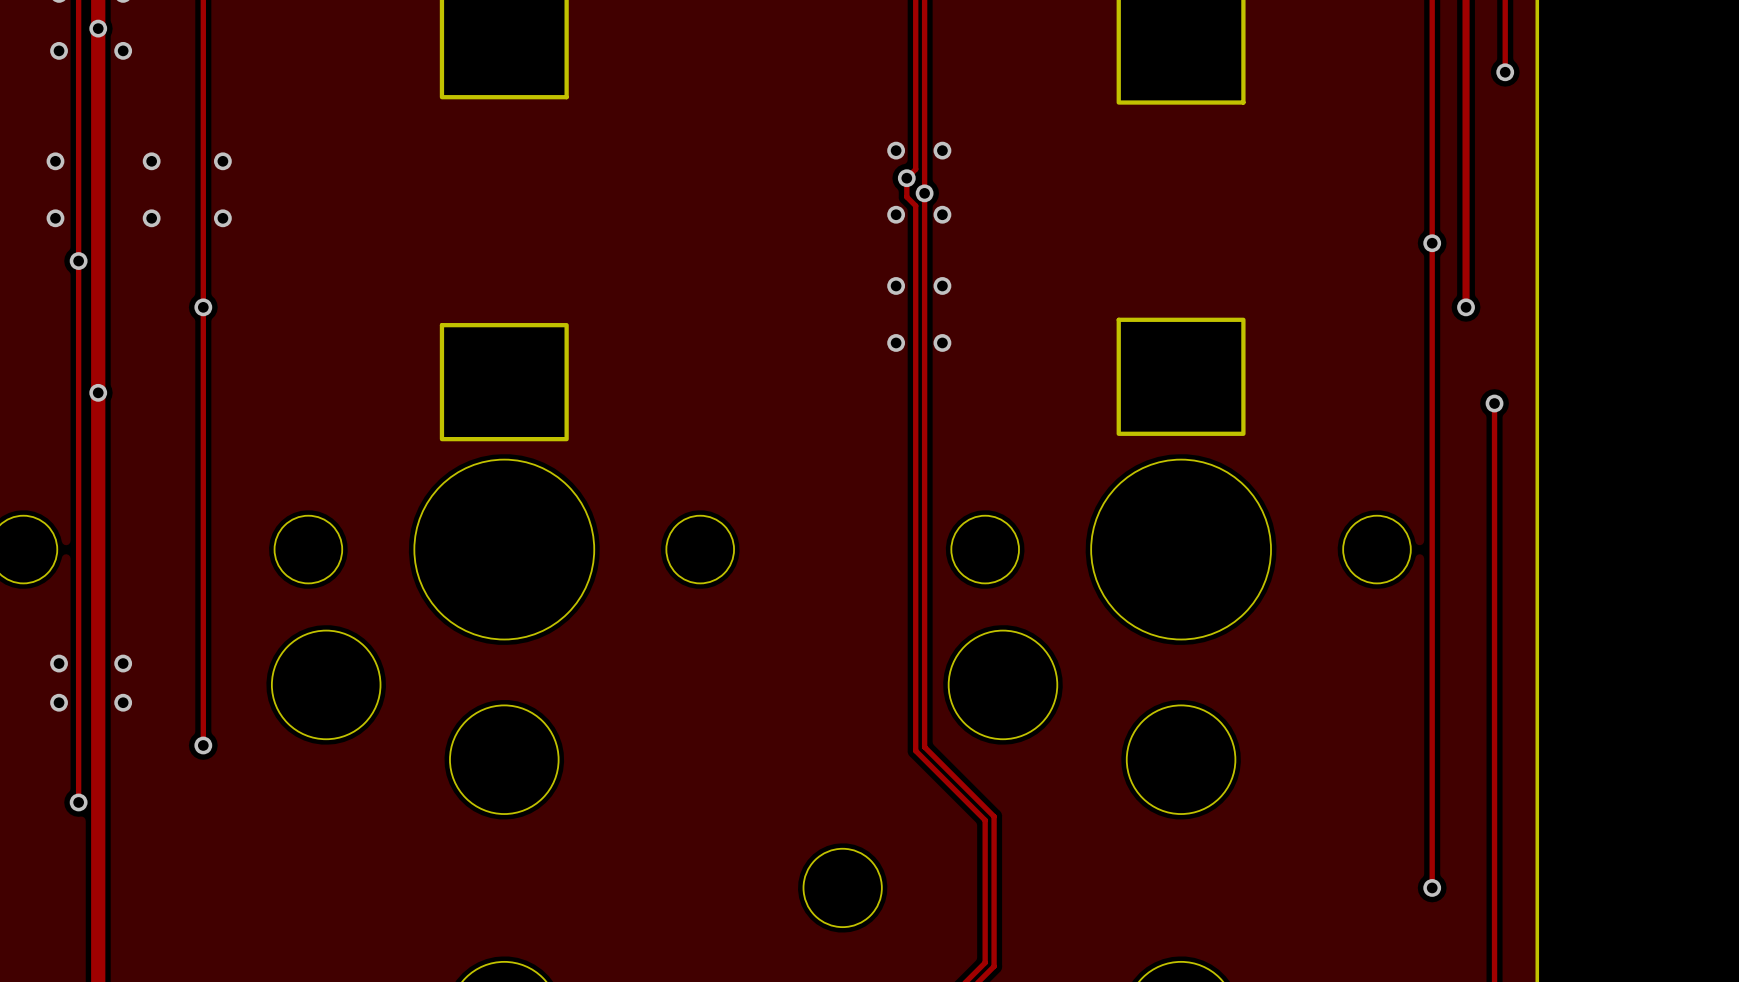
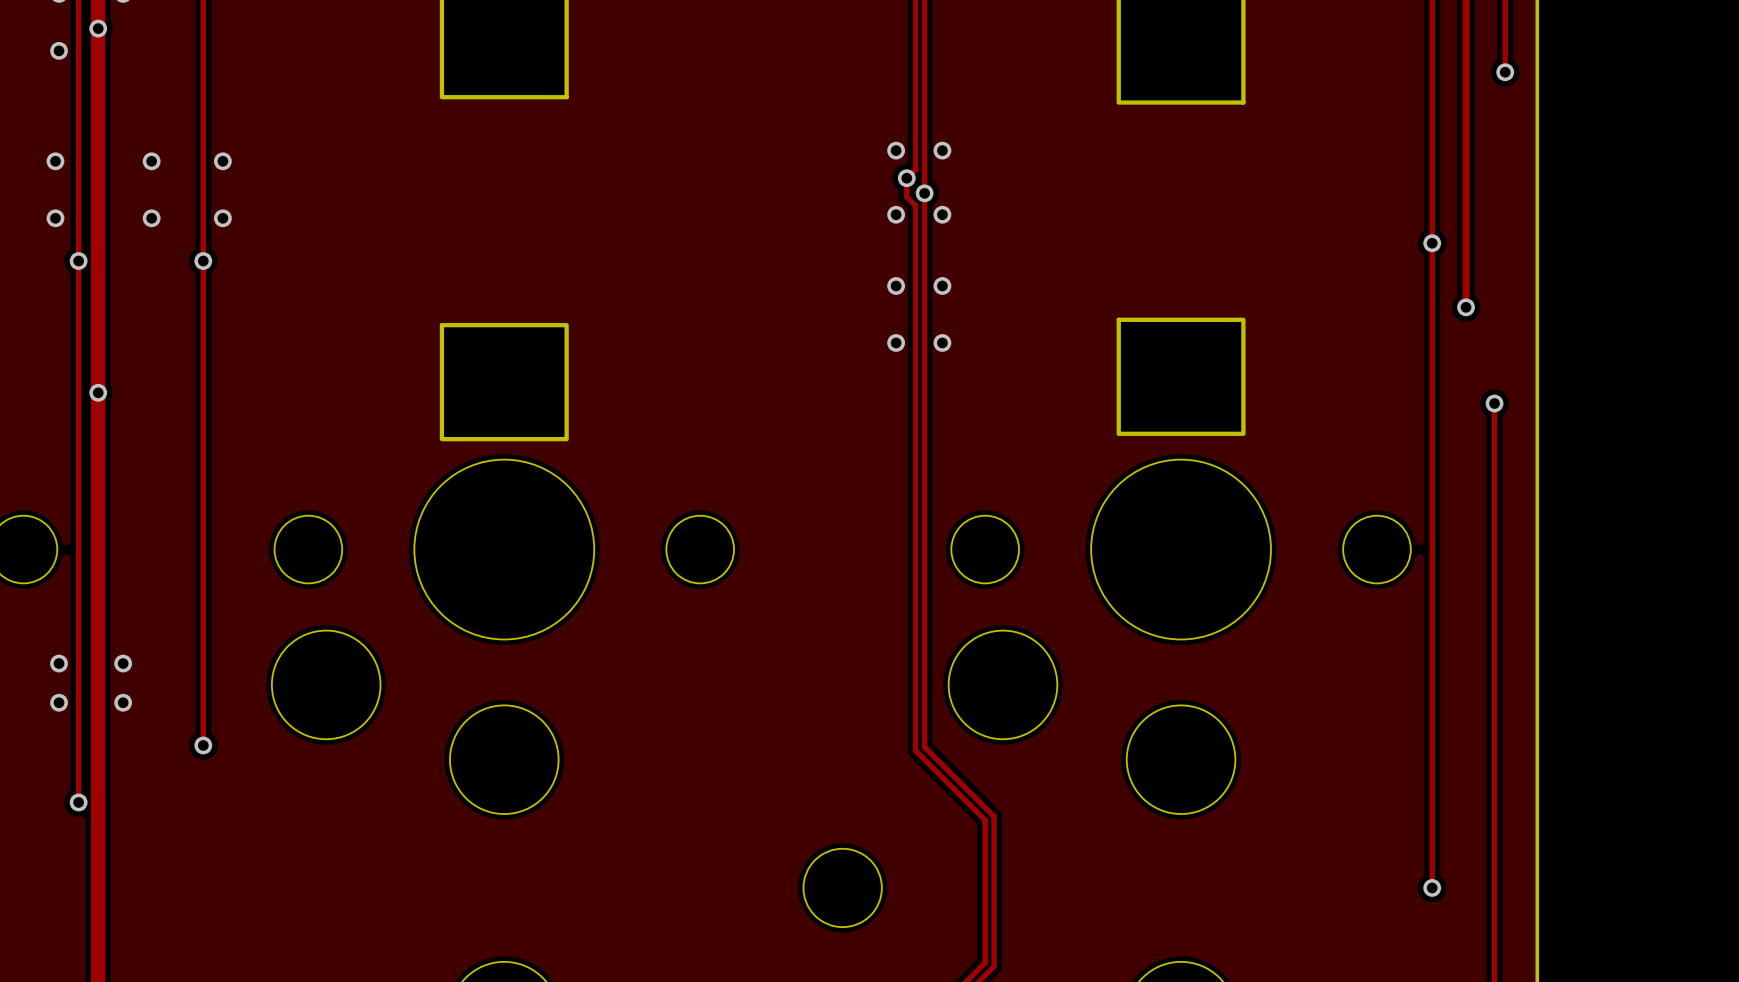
via: (123, 50) -> none
via position: (203, 307) -> (203, 261)

